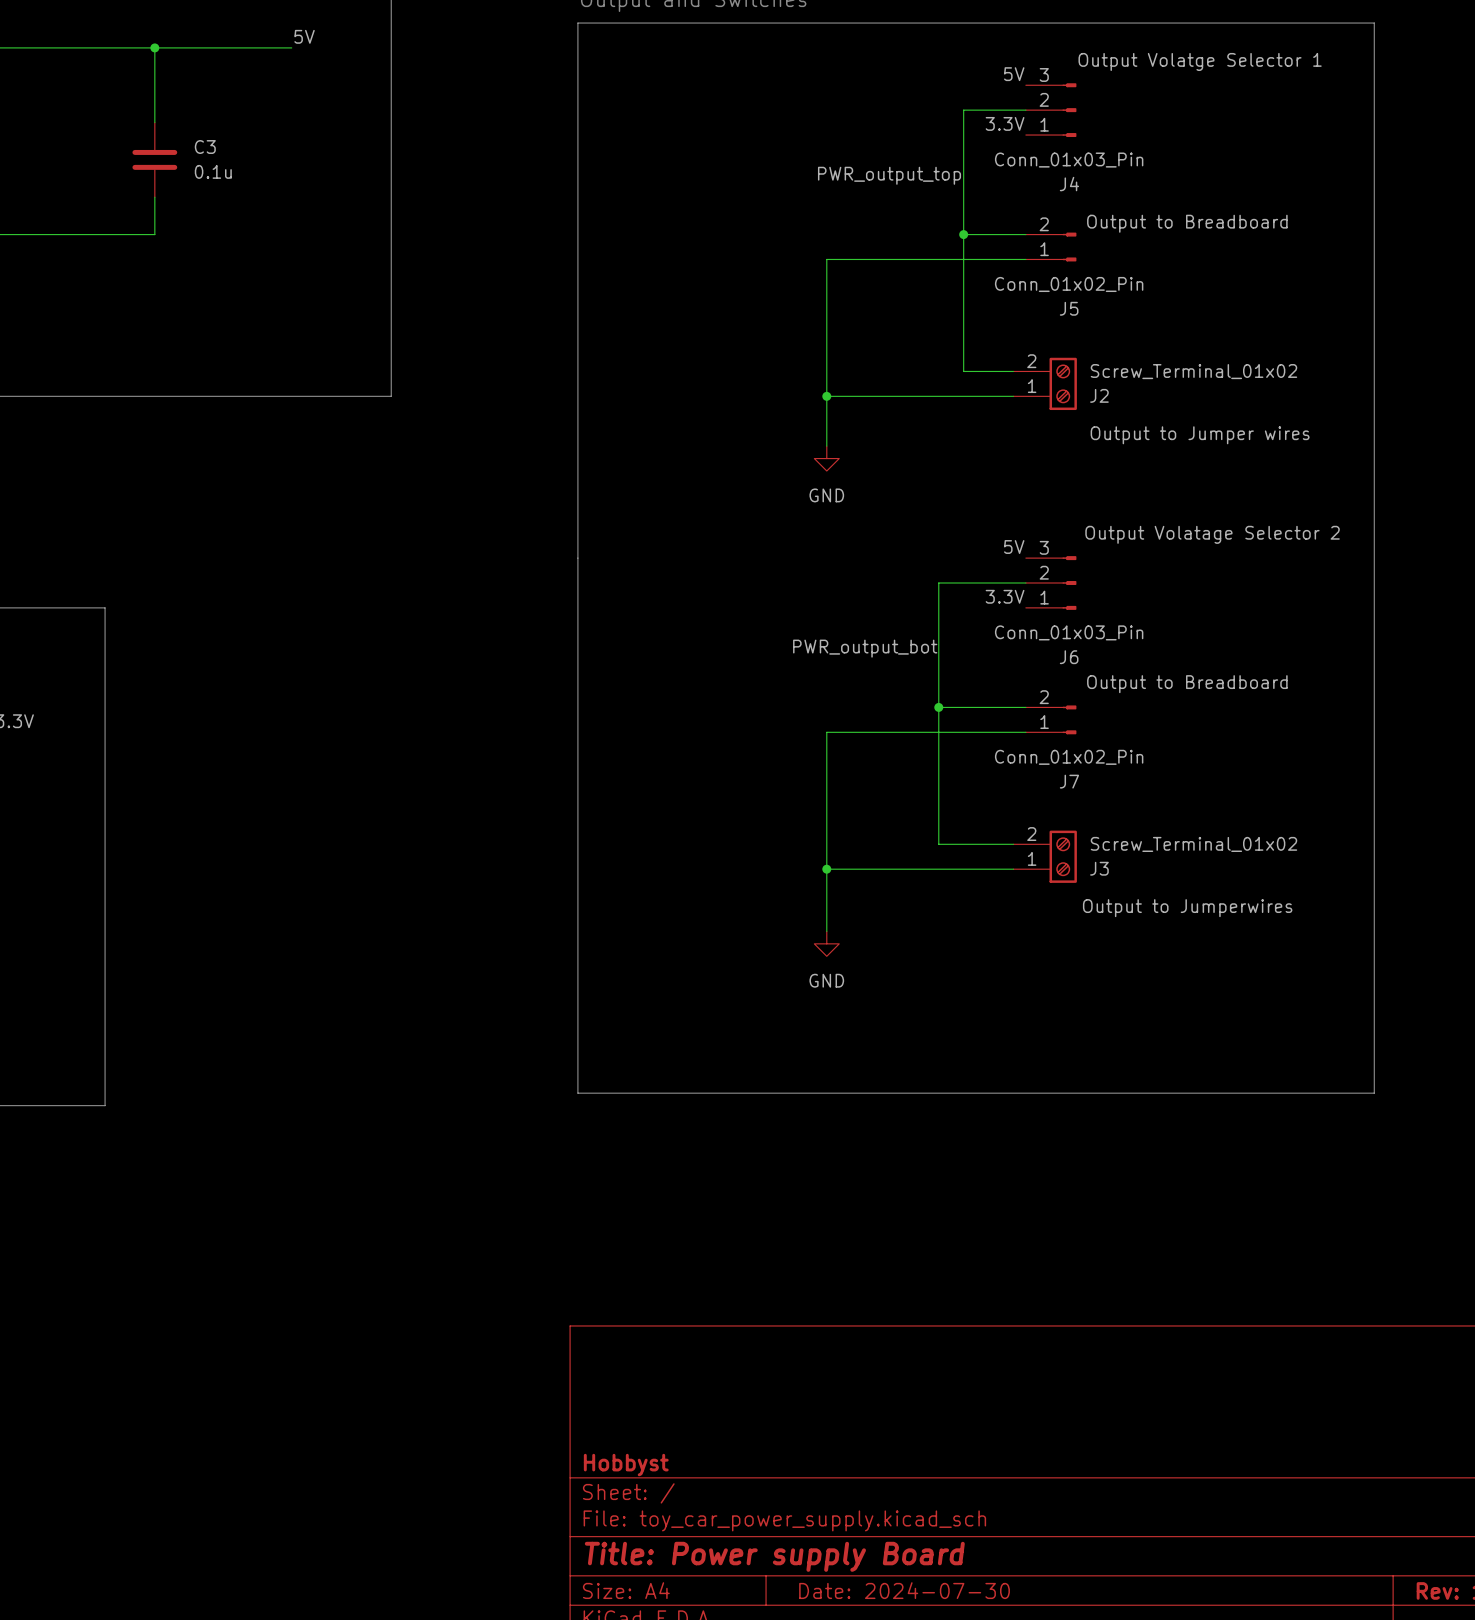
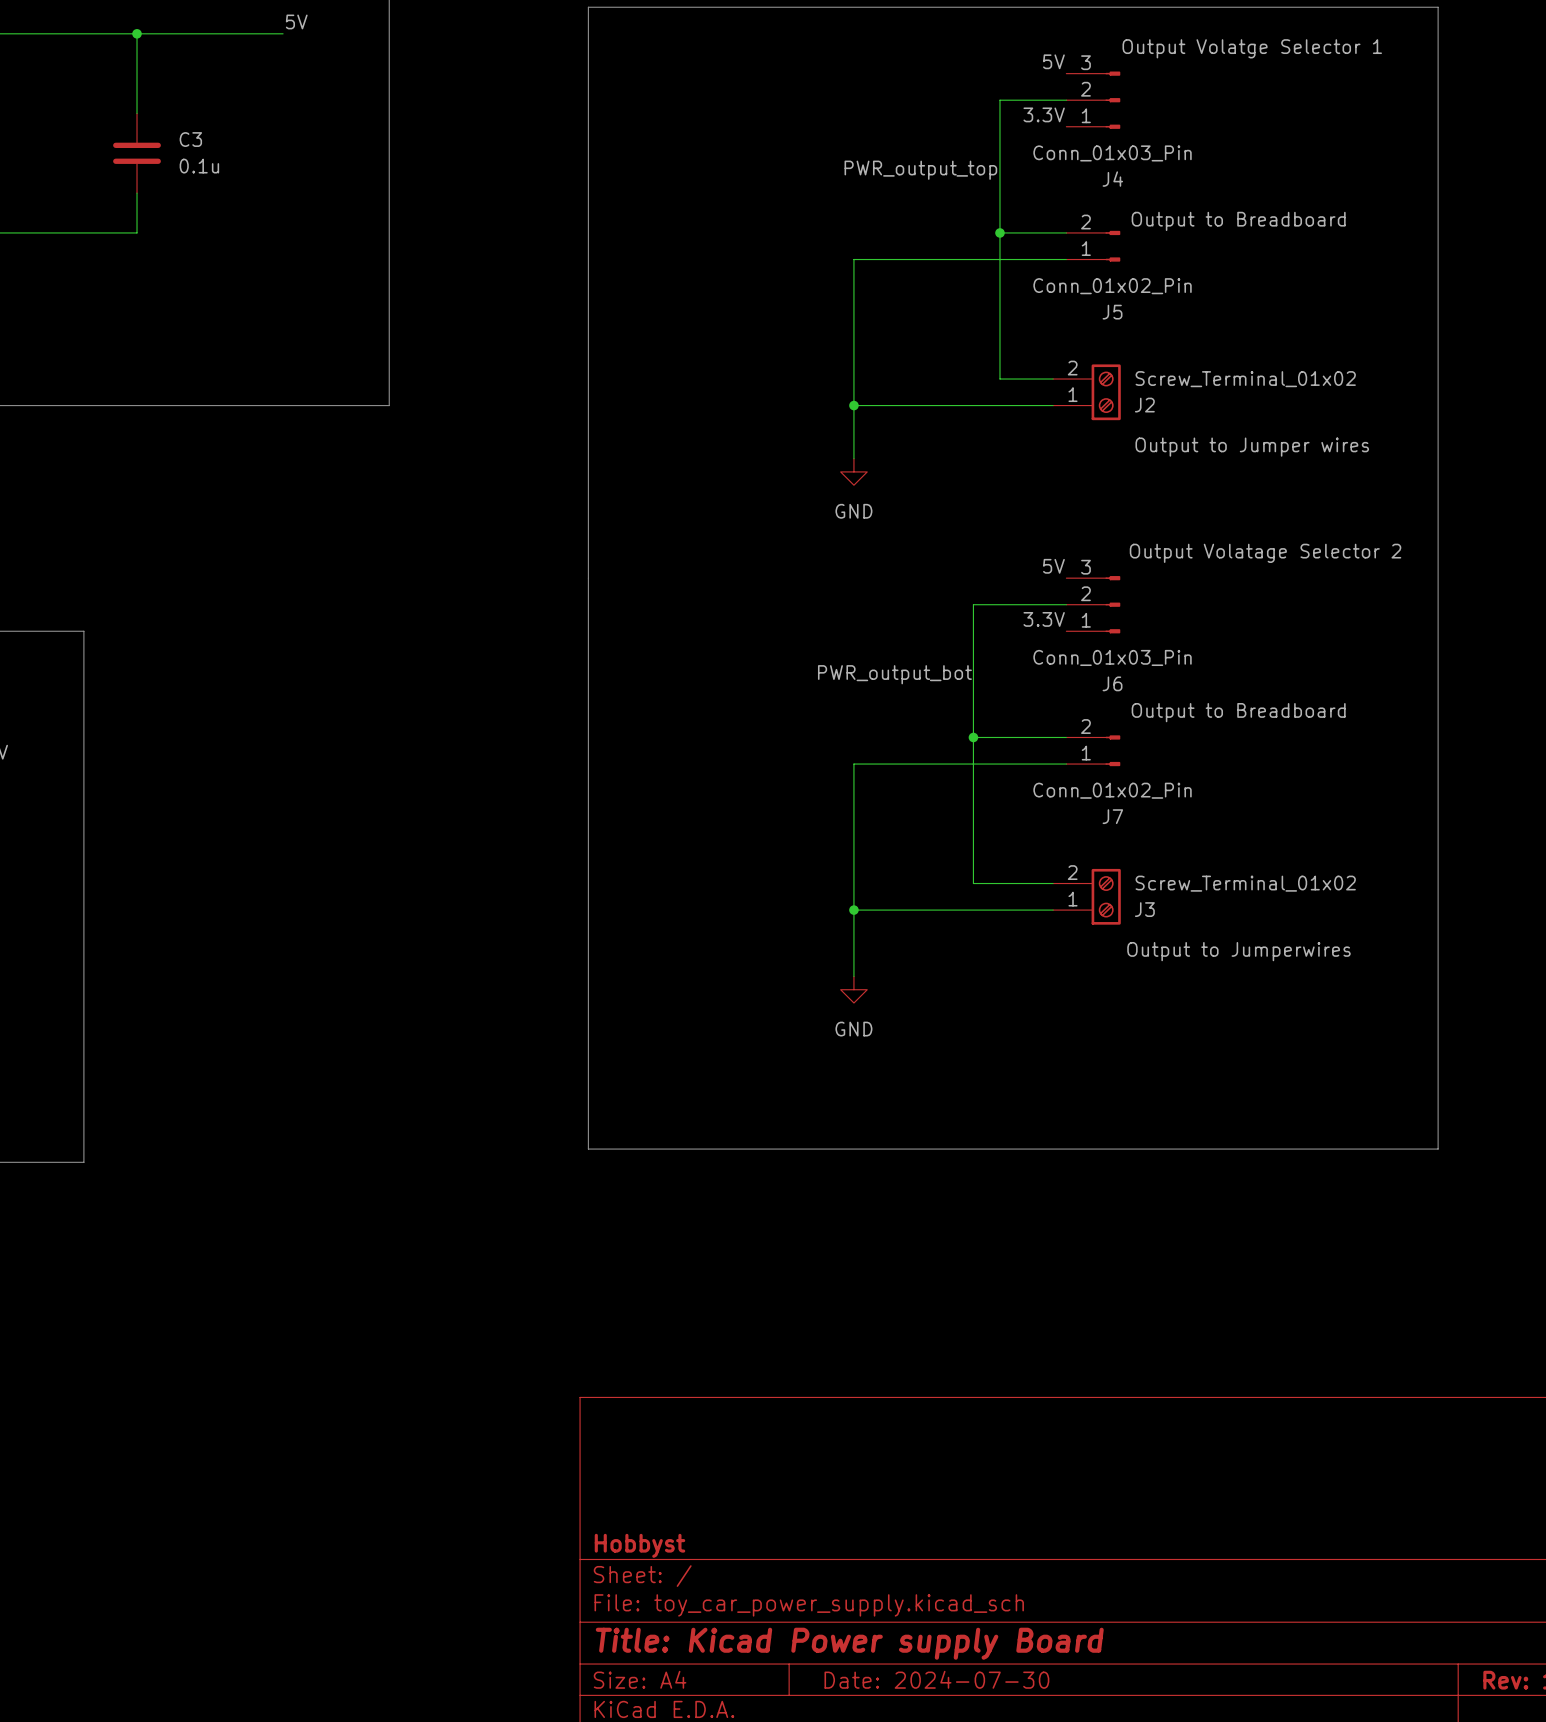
title block: Title: Power supply Board (774, 1556) -> Title: Kicad Power supply Board (849, 1643)

